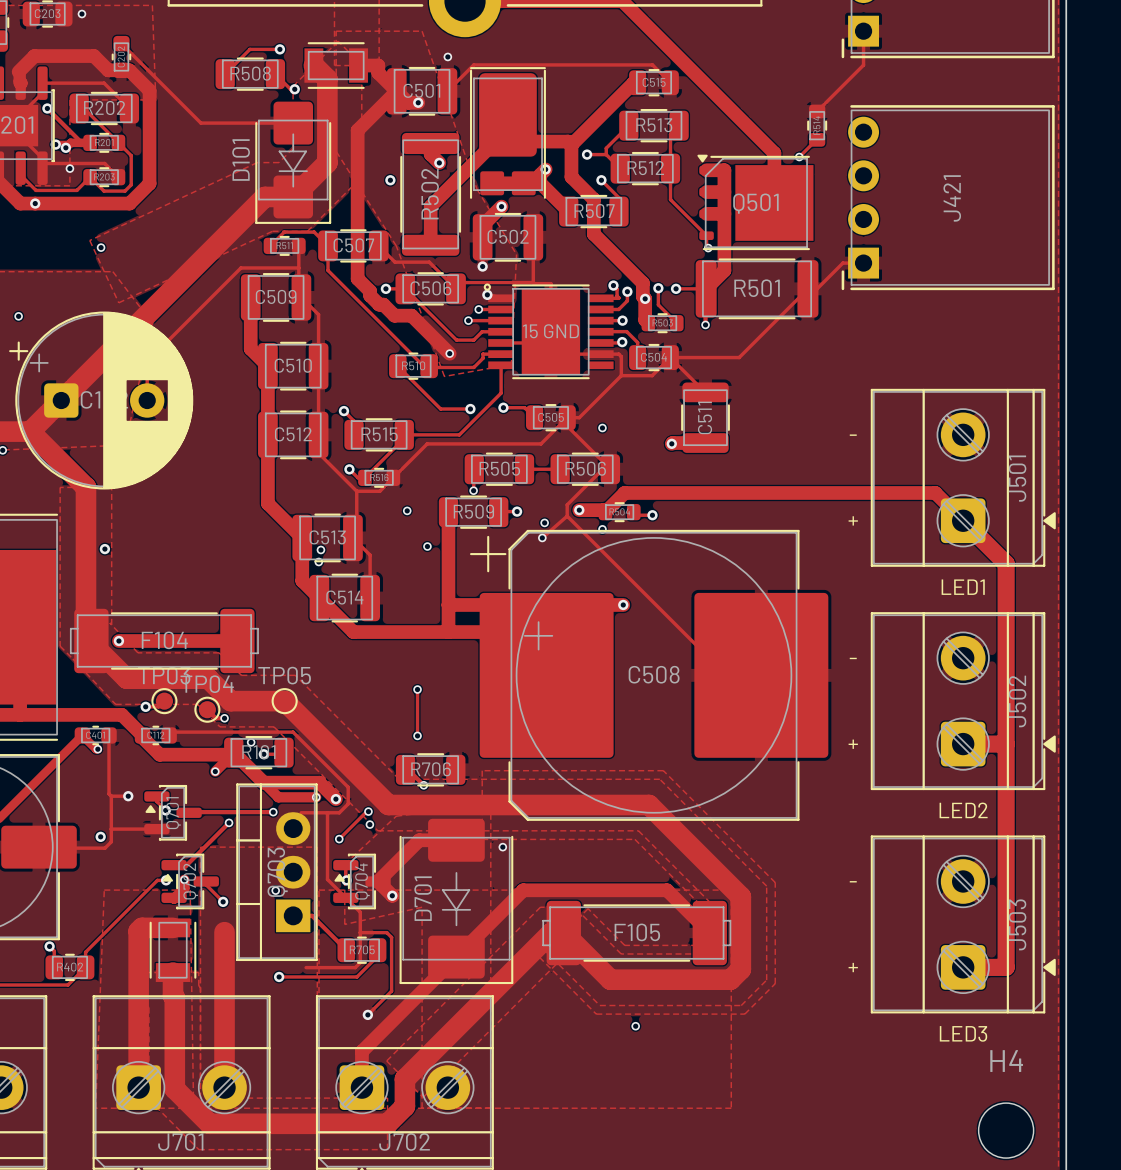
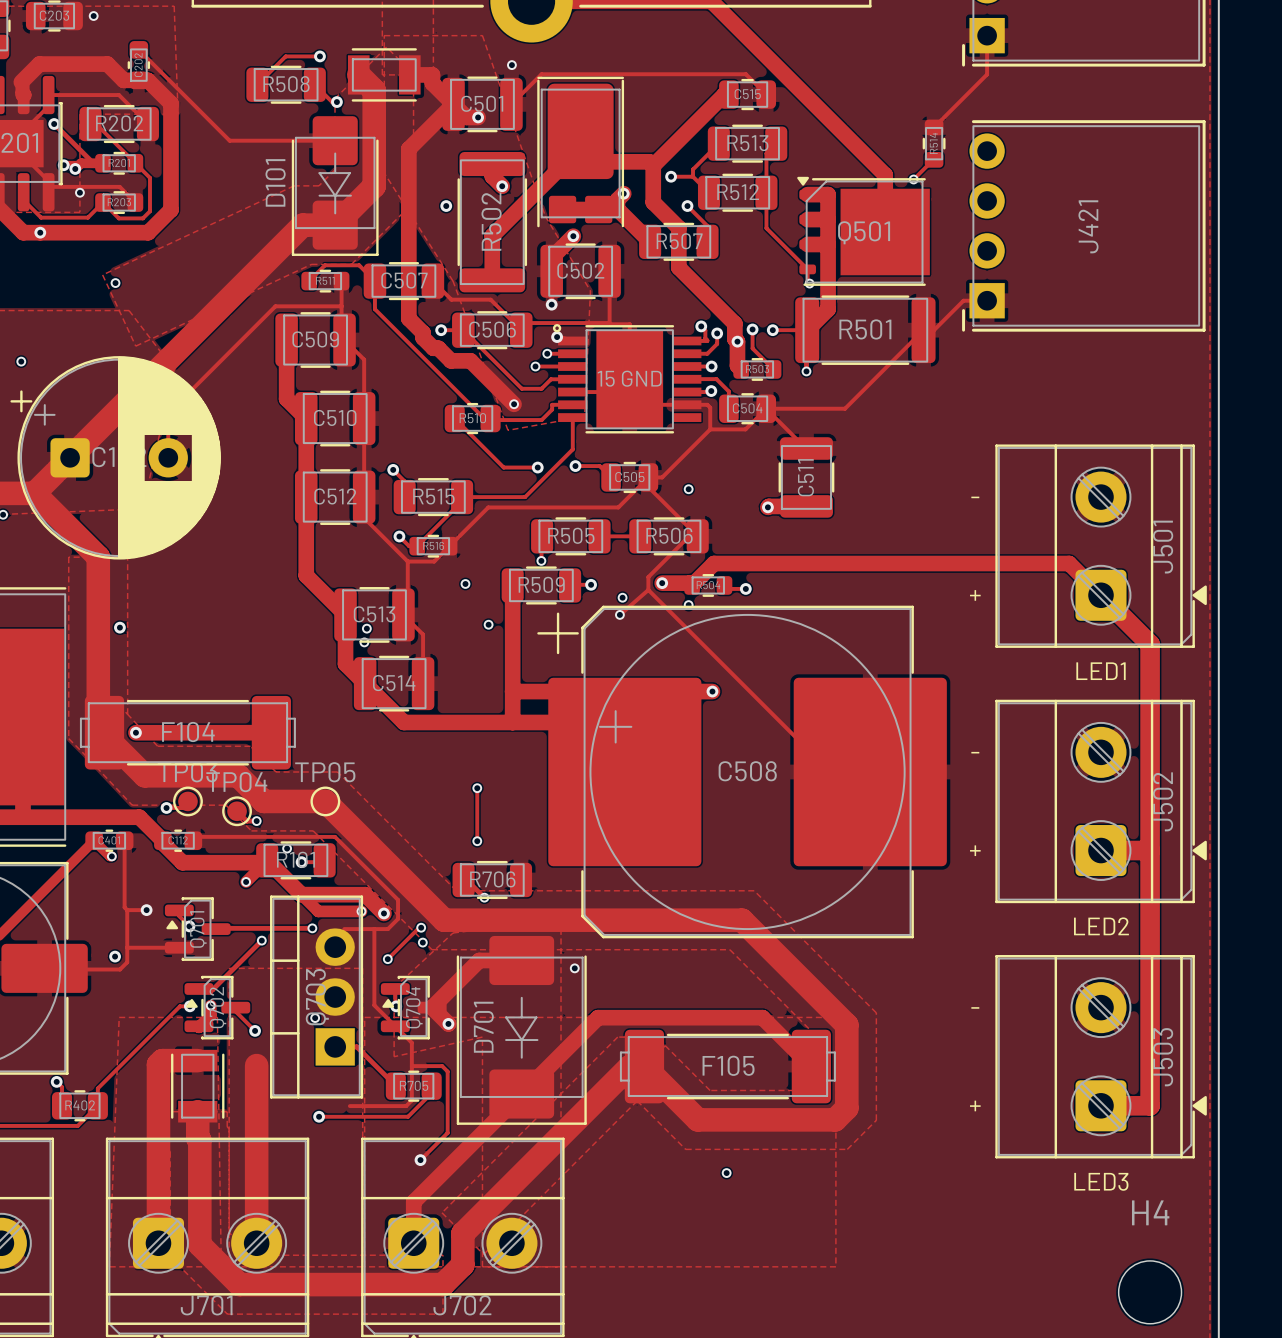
zone outline: (582, 914) (588, 908) (624, 945) (716, 945) (706, 955) (706, 911) (634, 839) (482, 839) (482, 770) (663, 770) (775, 882) (775, 983) (744, 1014) (596, 1014) (539, 957) (545, 951) -> none

